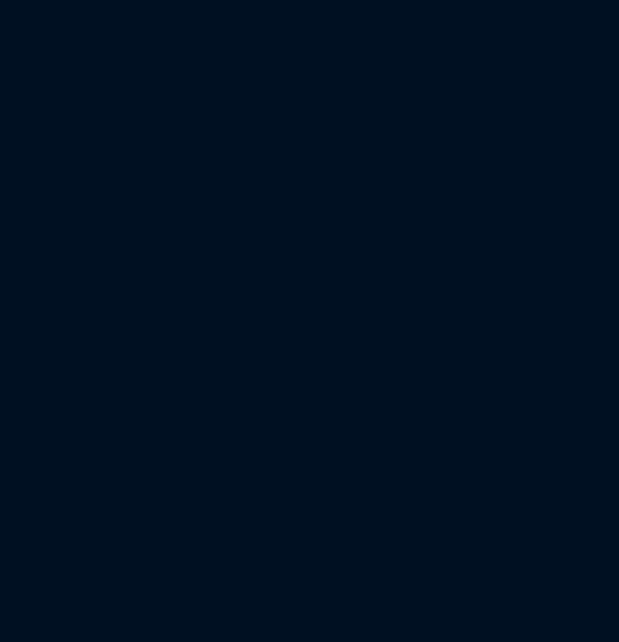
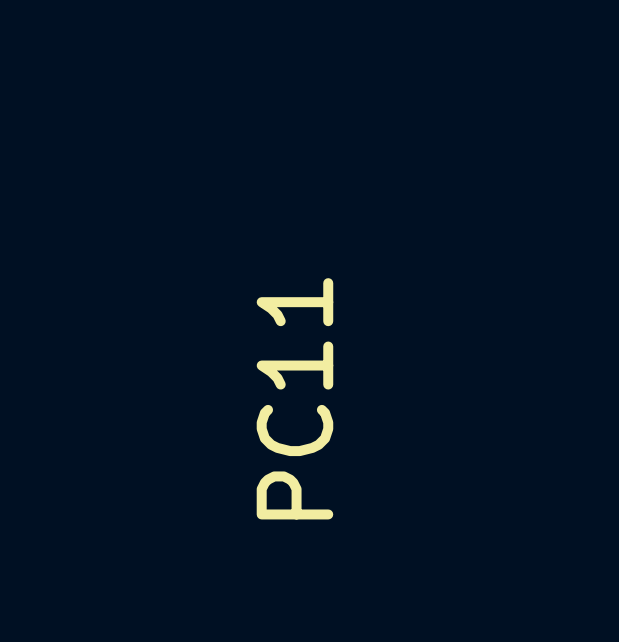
text: none -> PC11 (294, 398)

